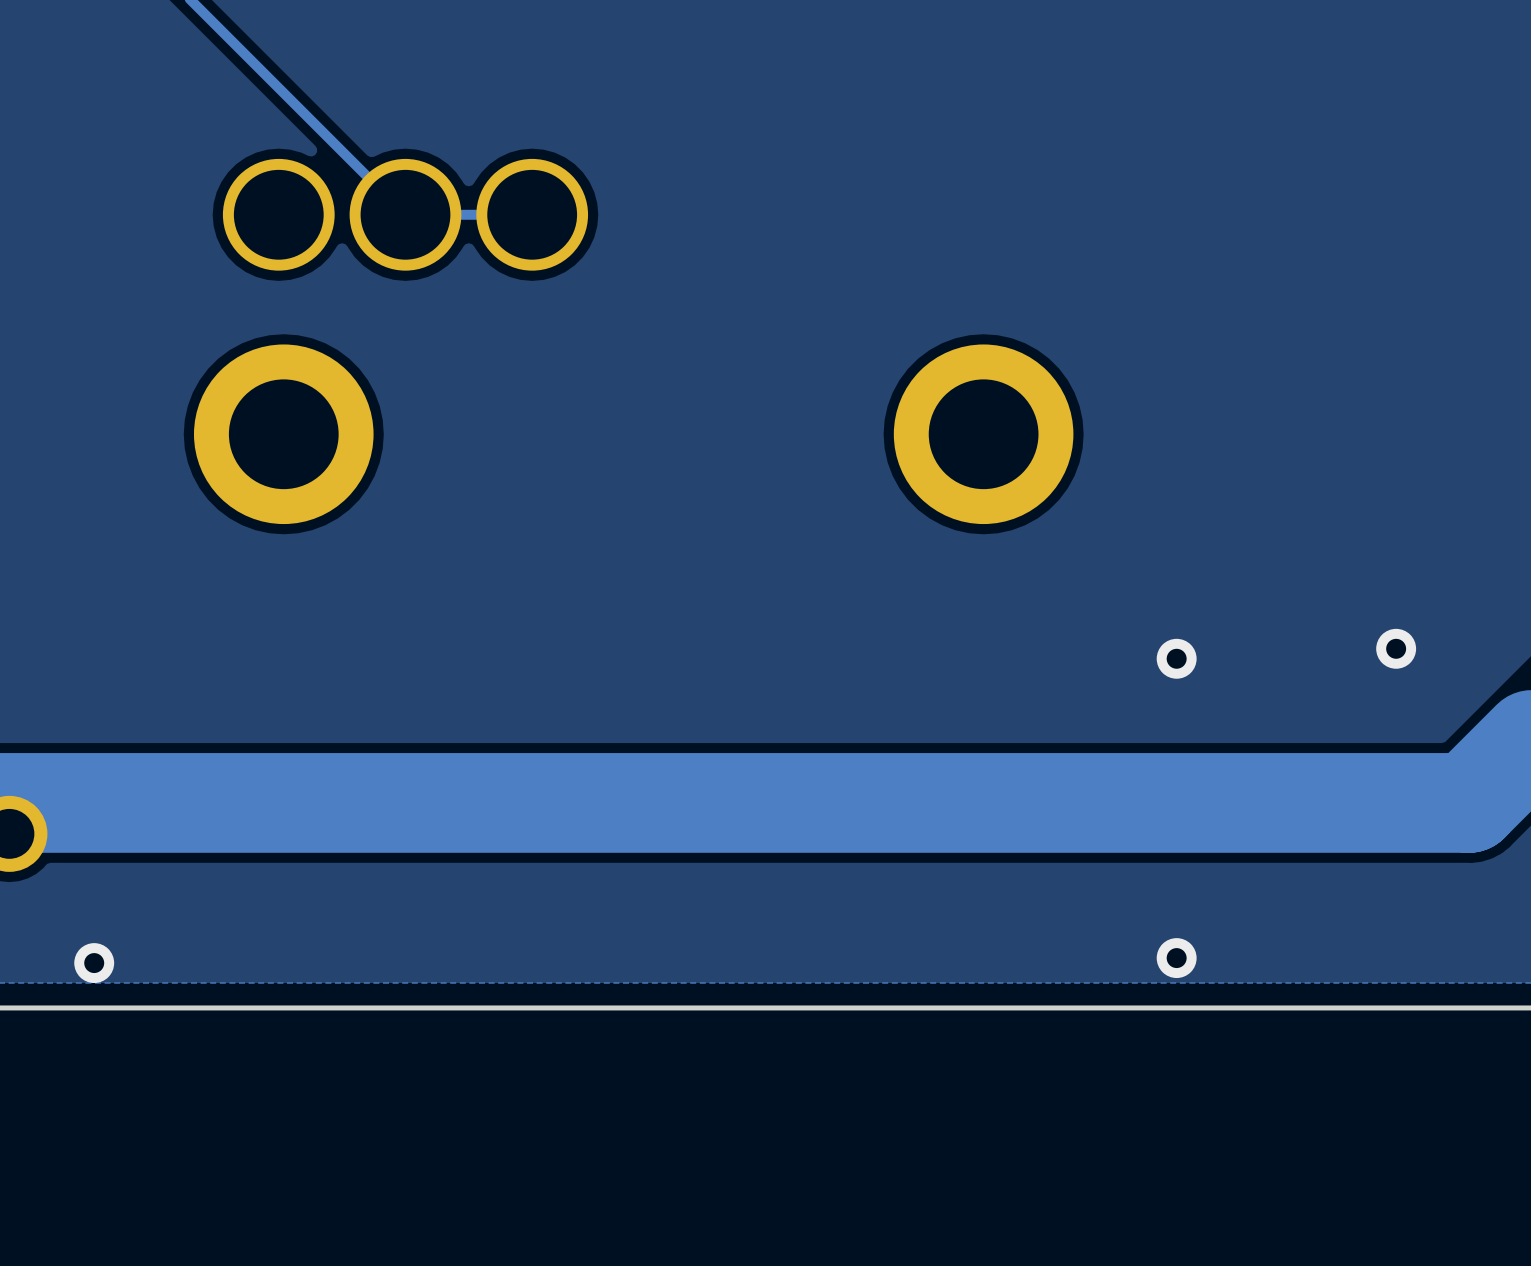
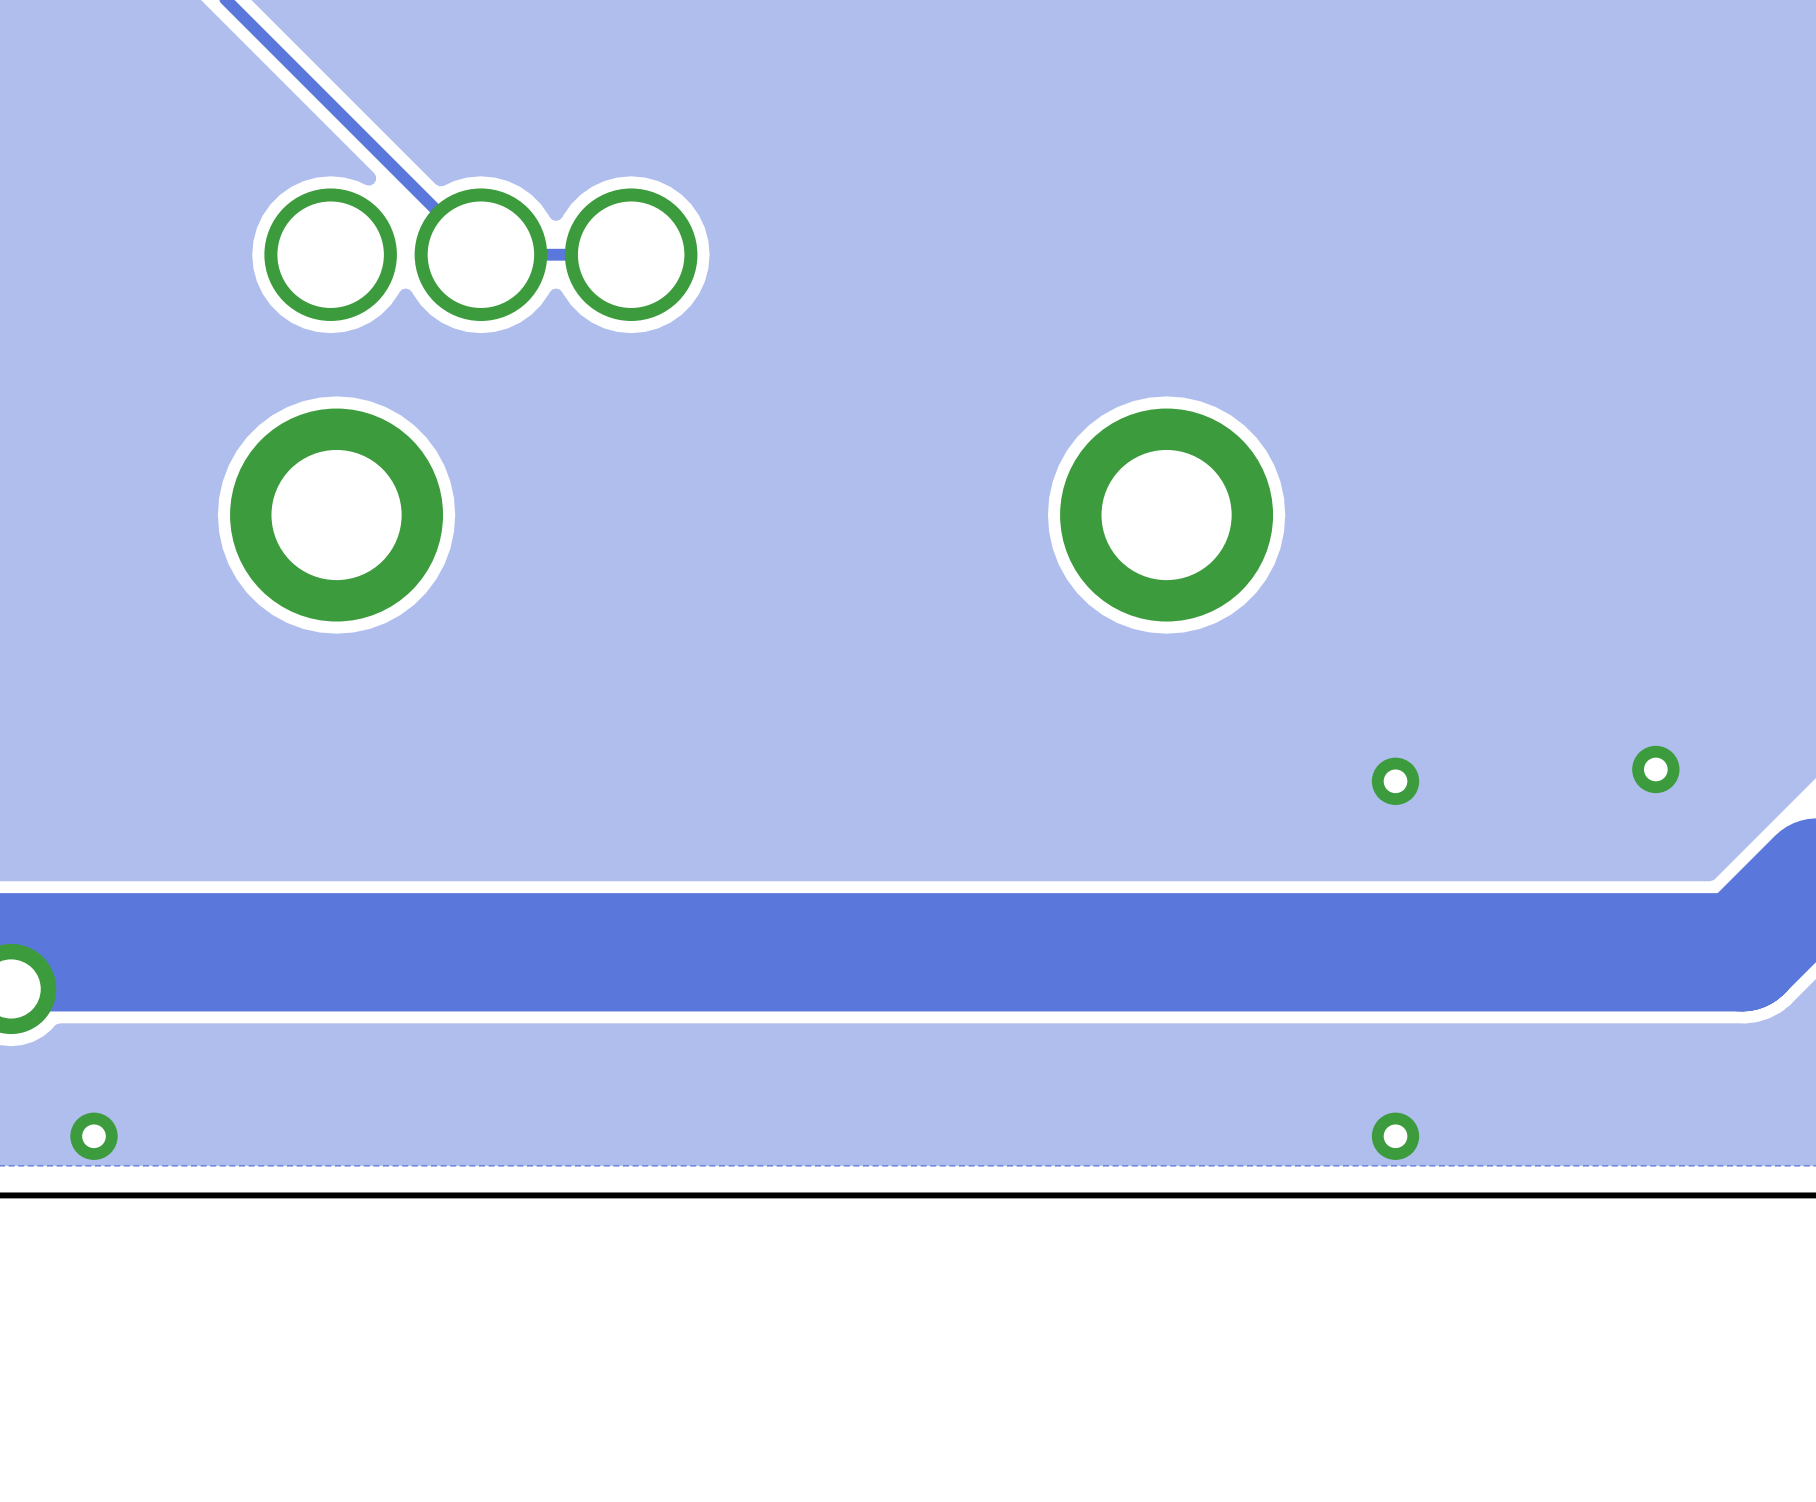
via position: (94, 963) -> (93, 1136)

